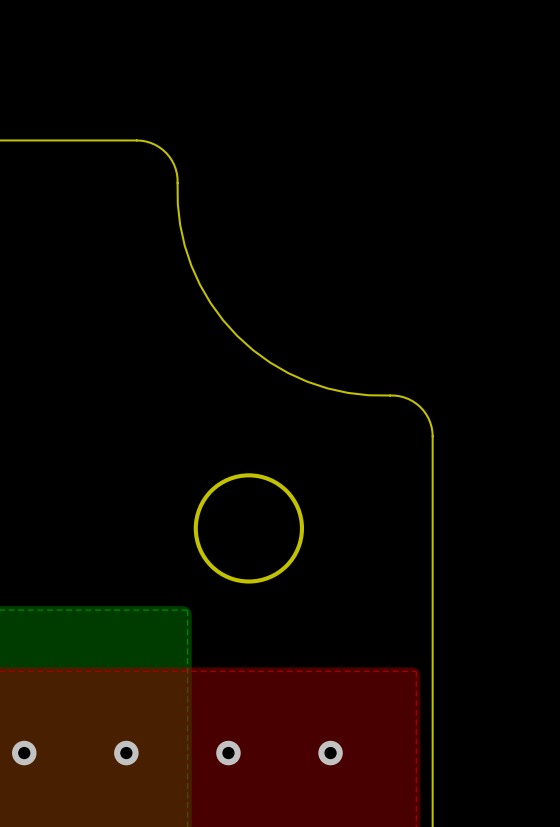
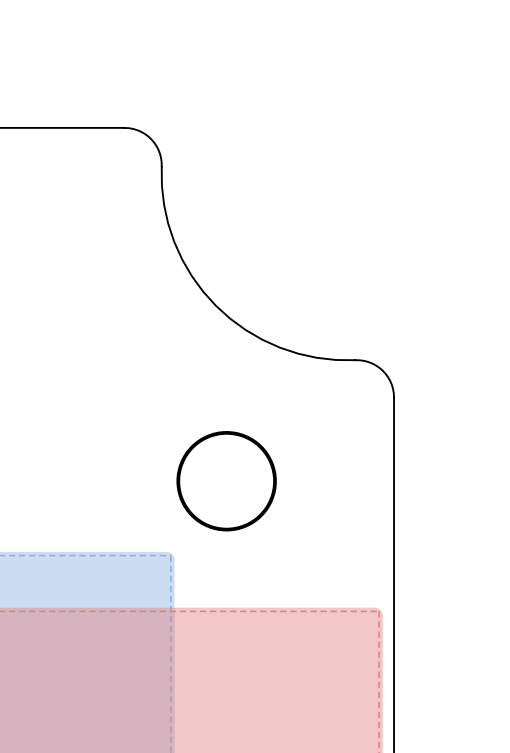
via: (24, 753) -> none
via: (126, 753) -> none
via: (228, 753) -> none
via: (330, 753) -> none

